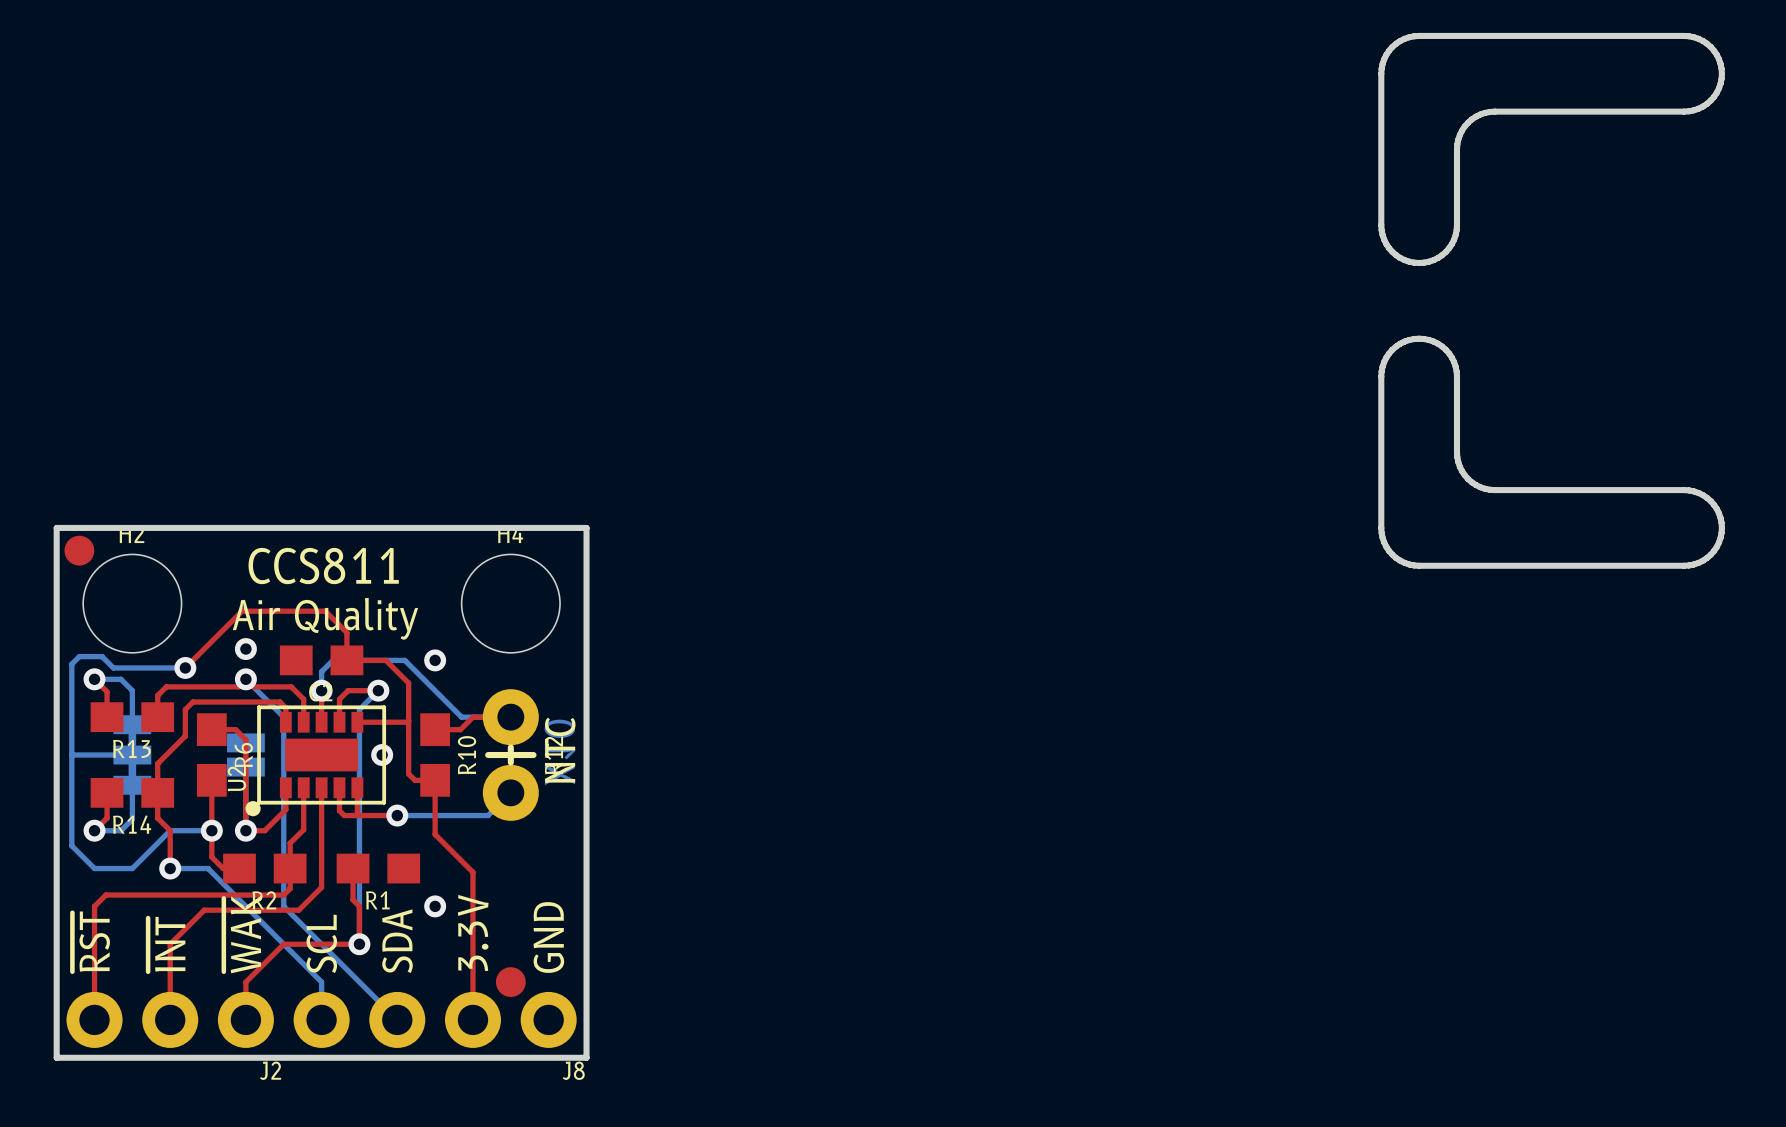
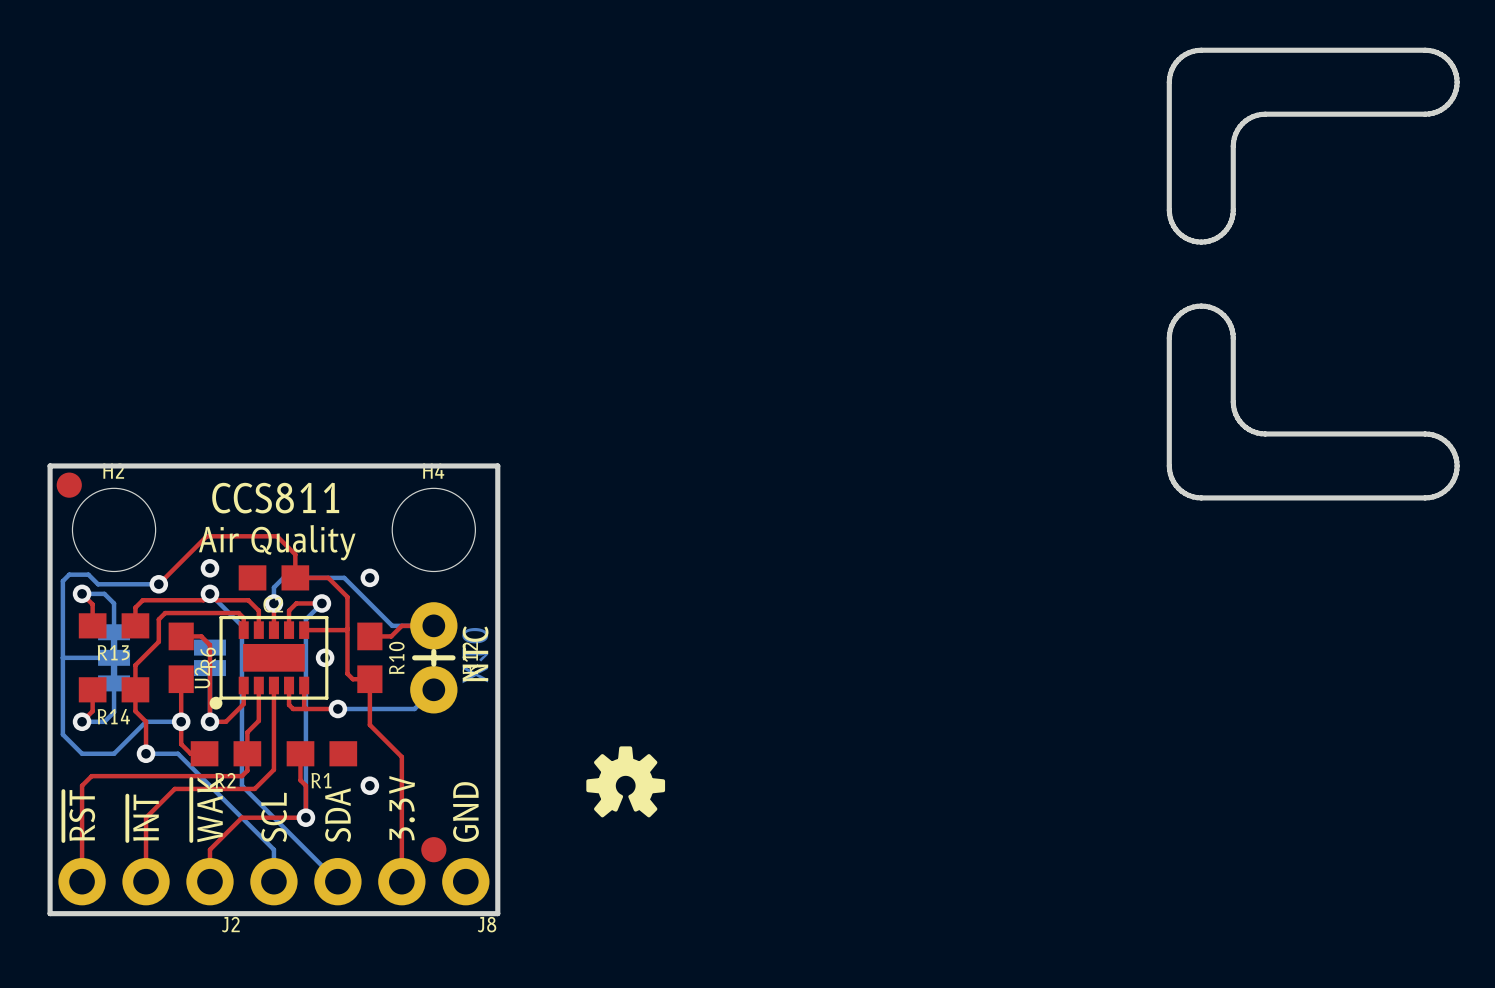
drawing: none -> [586, 746, 666, 818]

